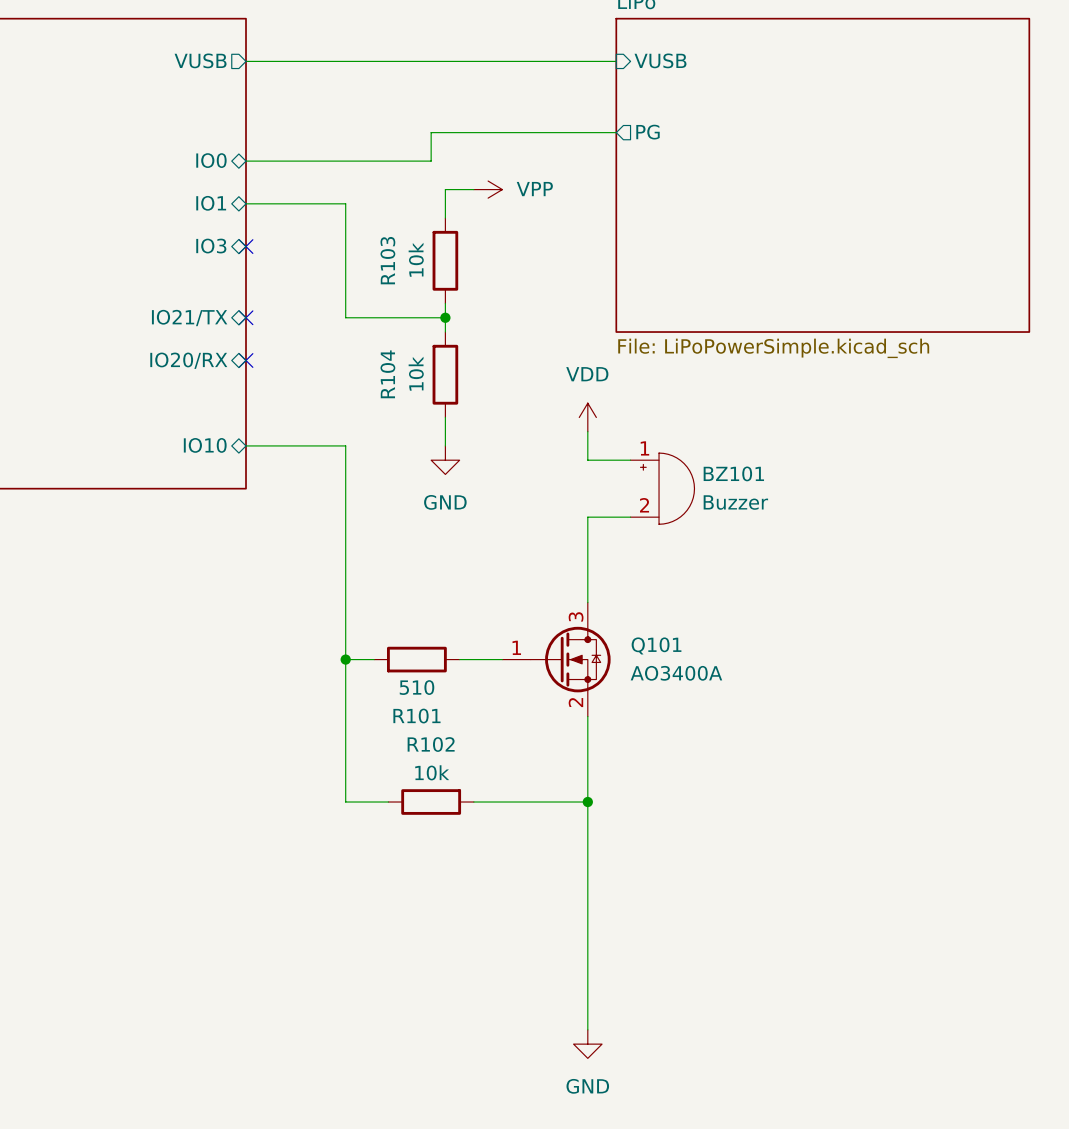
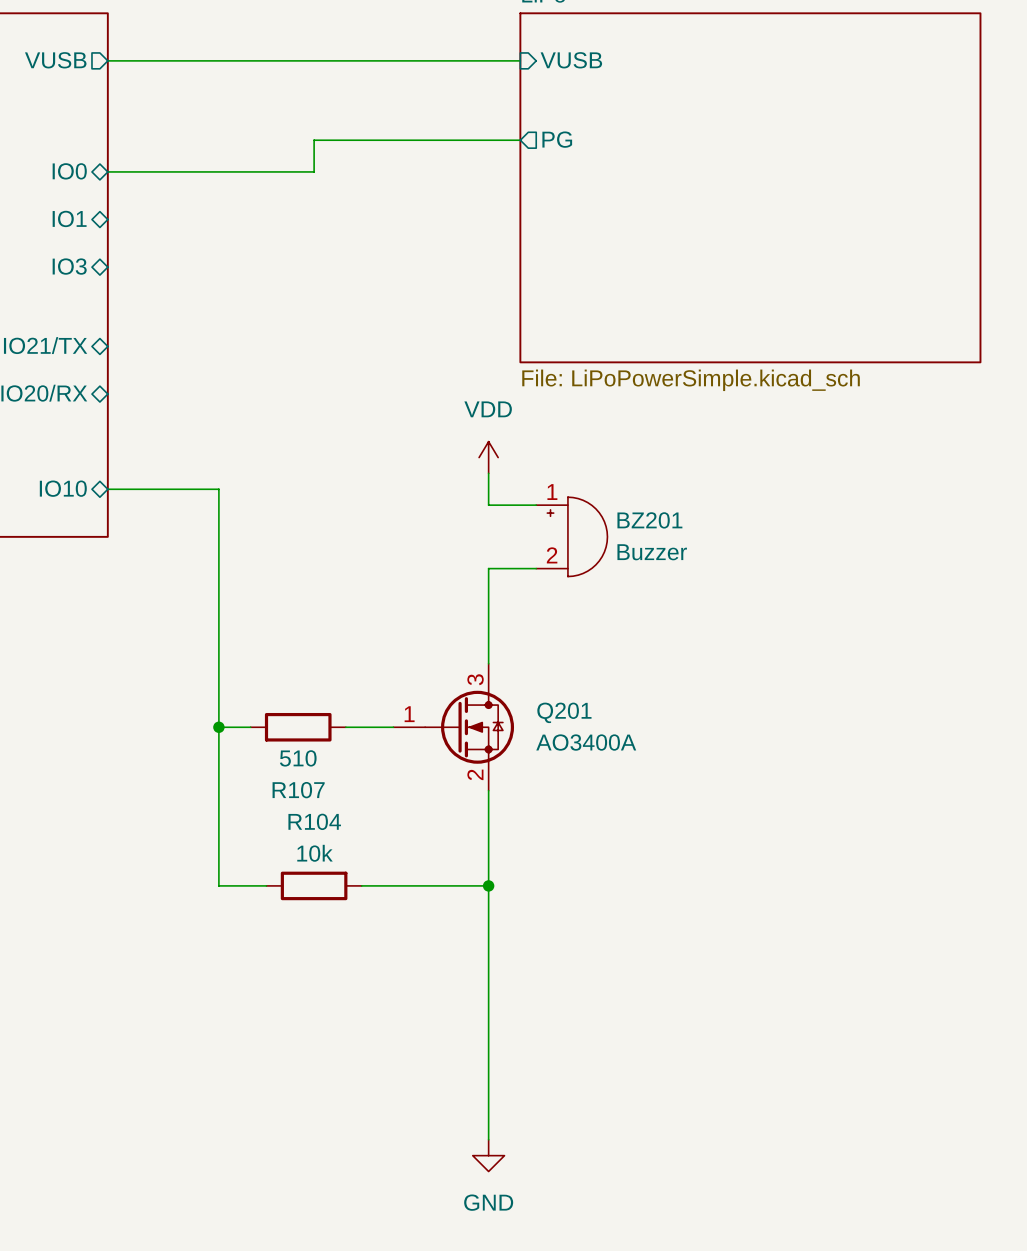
wire: (473, 189) (445, 189) (445, 218) -> none
power symbol: VPP (488, 189) -> none
wire: (246, 203) (345, 203) (345, 317) (445, 317) -> none
no-connect mark: (246, 246) -> none
R103: 10k (445, 260) -> none
wire: (445, 303) (445, 332) -> none
no-connect mark: (246, 317) -> none
junction: (445, 317) -> none
no-connect mark: (246, 360) -> none
R104: 10k (445, 374) -> none
wire: (445, 417) (445, 445) -> none
power symbol: GND (445, 460) -> none
BZ101 name: BZ101 (733, 473) -> BZ201 (649, 520)
Q101 name: Q101 (656, 645) -> Q201 (564, 712)
R101 name: R101 (416, 716) -> R107 (298, 790)
R102 name: R102 (431, 744) -> R104 (314, 821)

